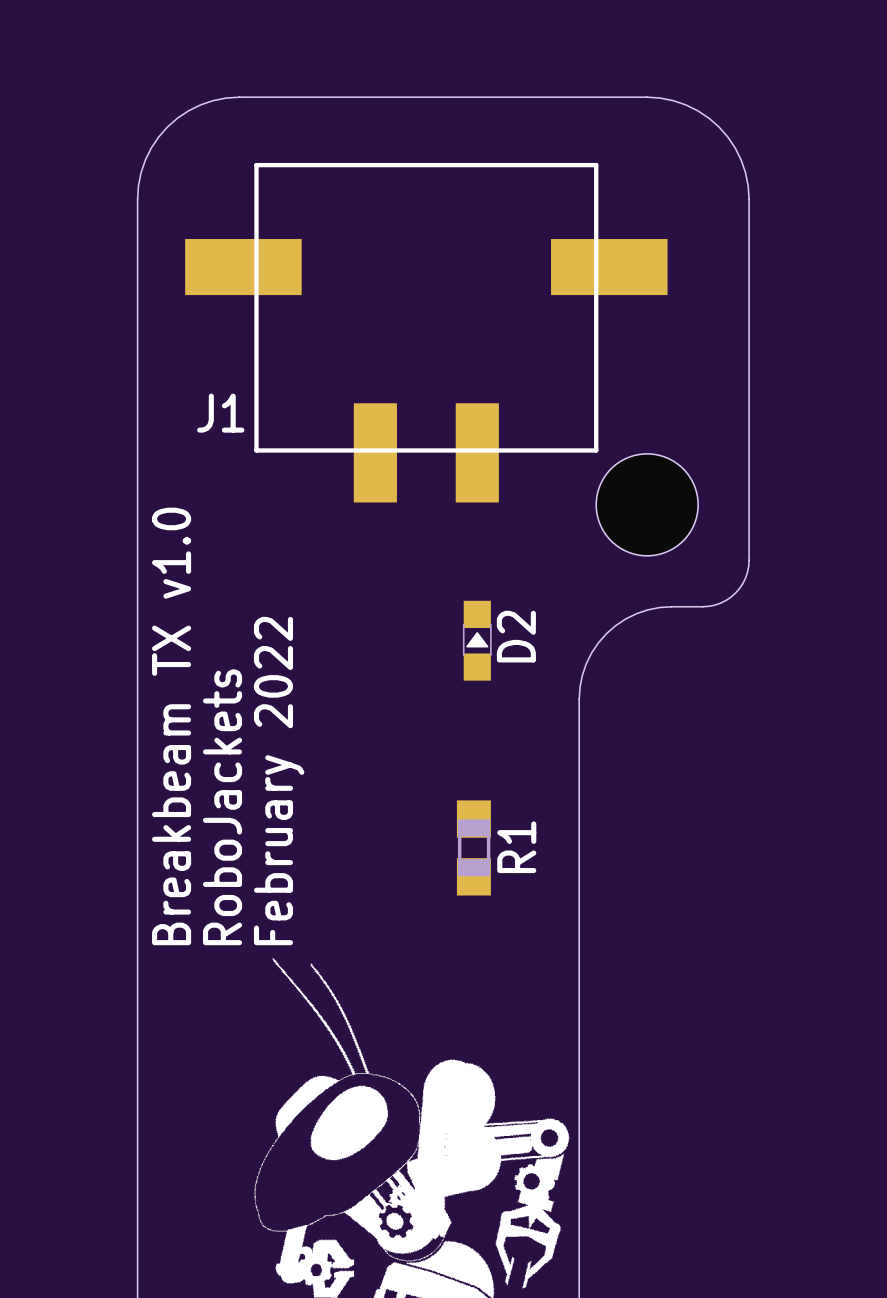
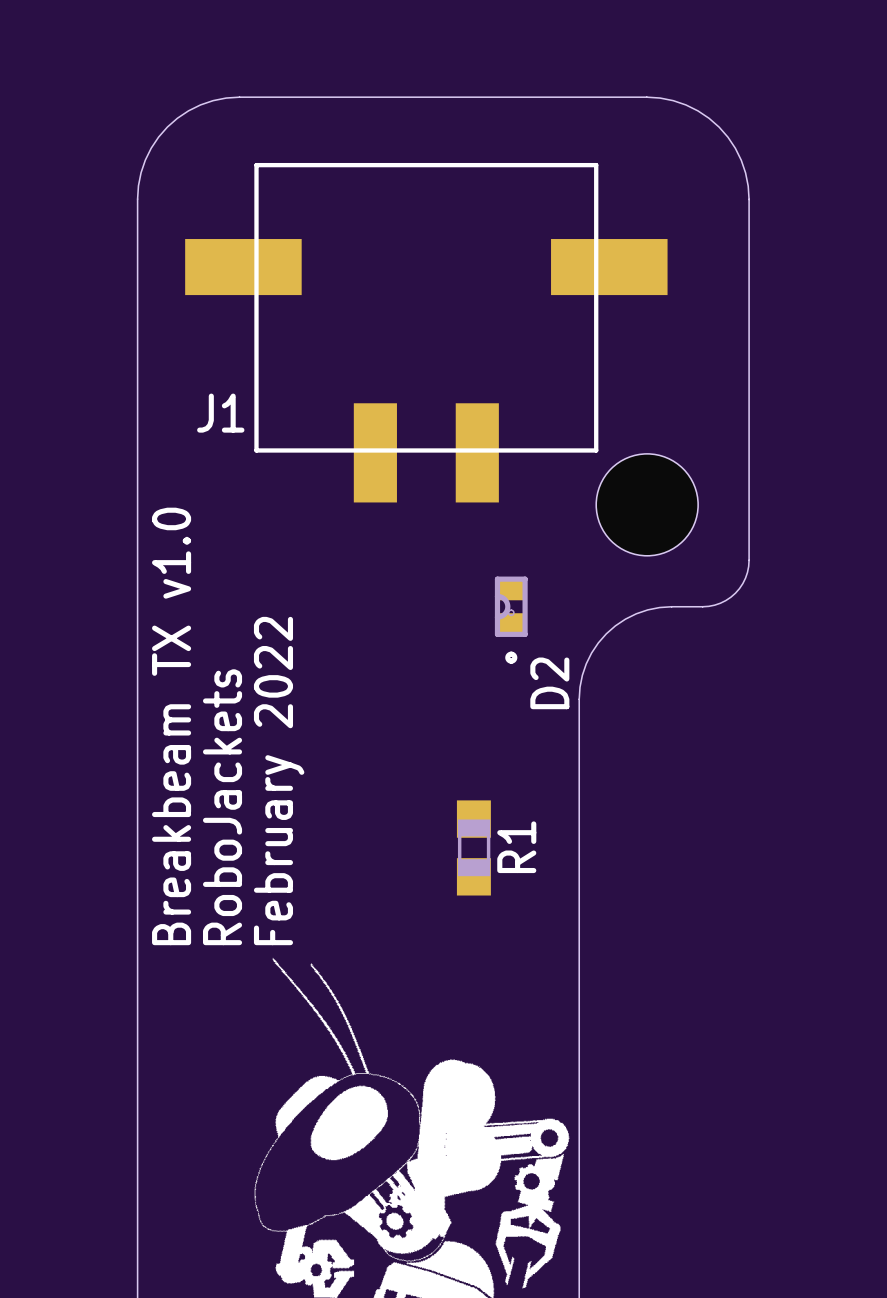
D2 footprint: [462, 600, 492, 681] -> [494, 576, 528, 664]

